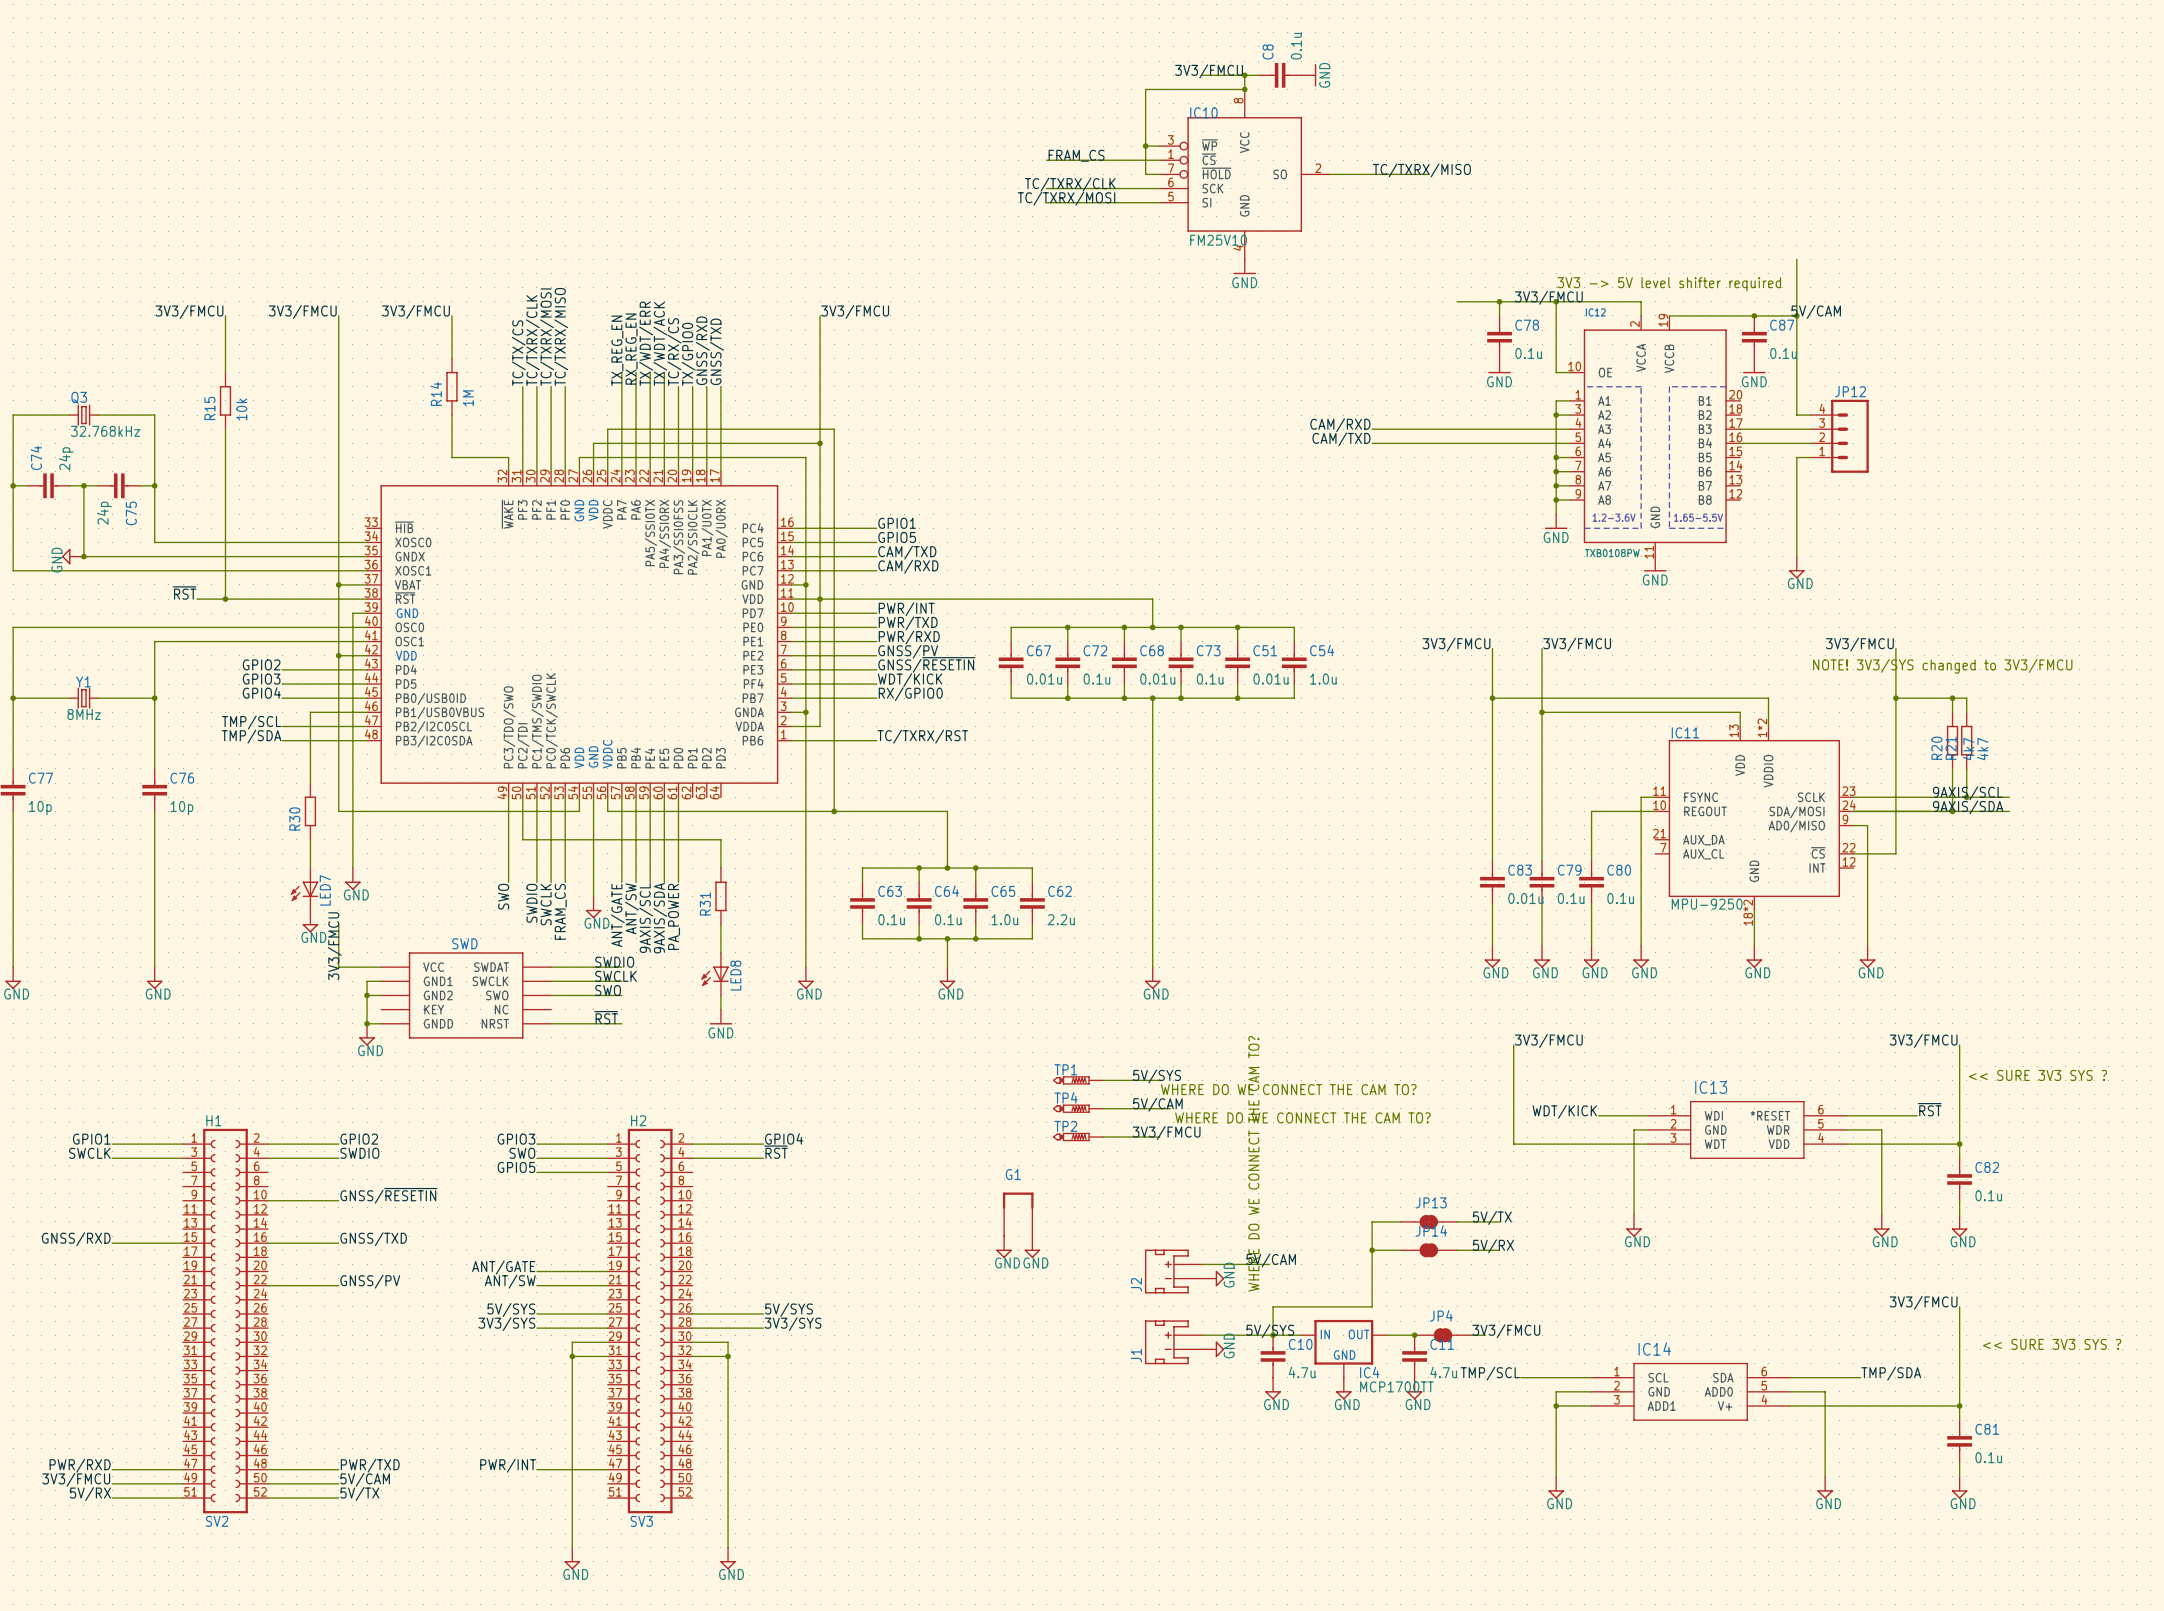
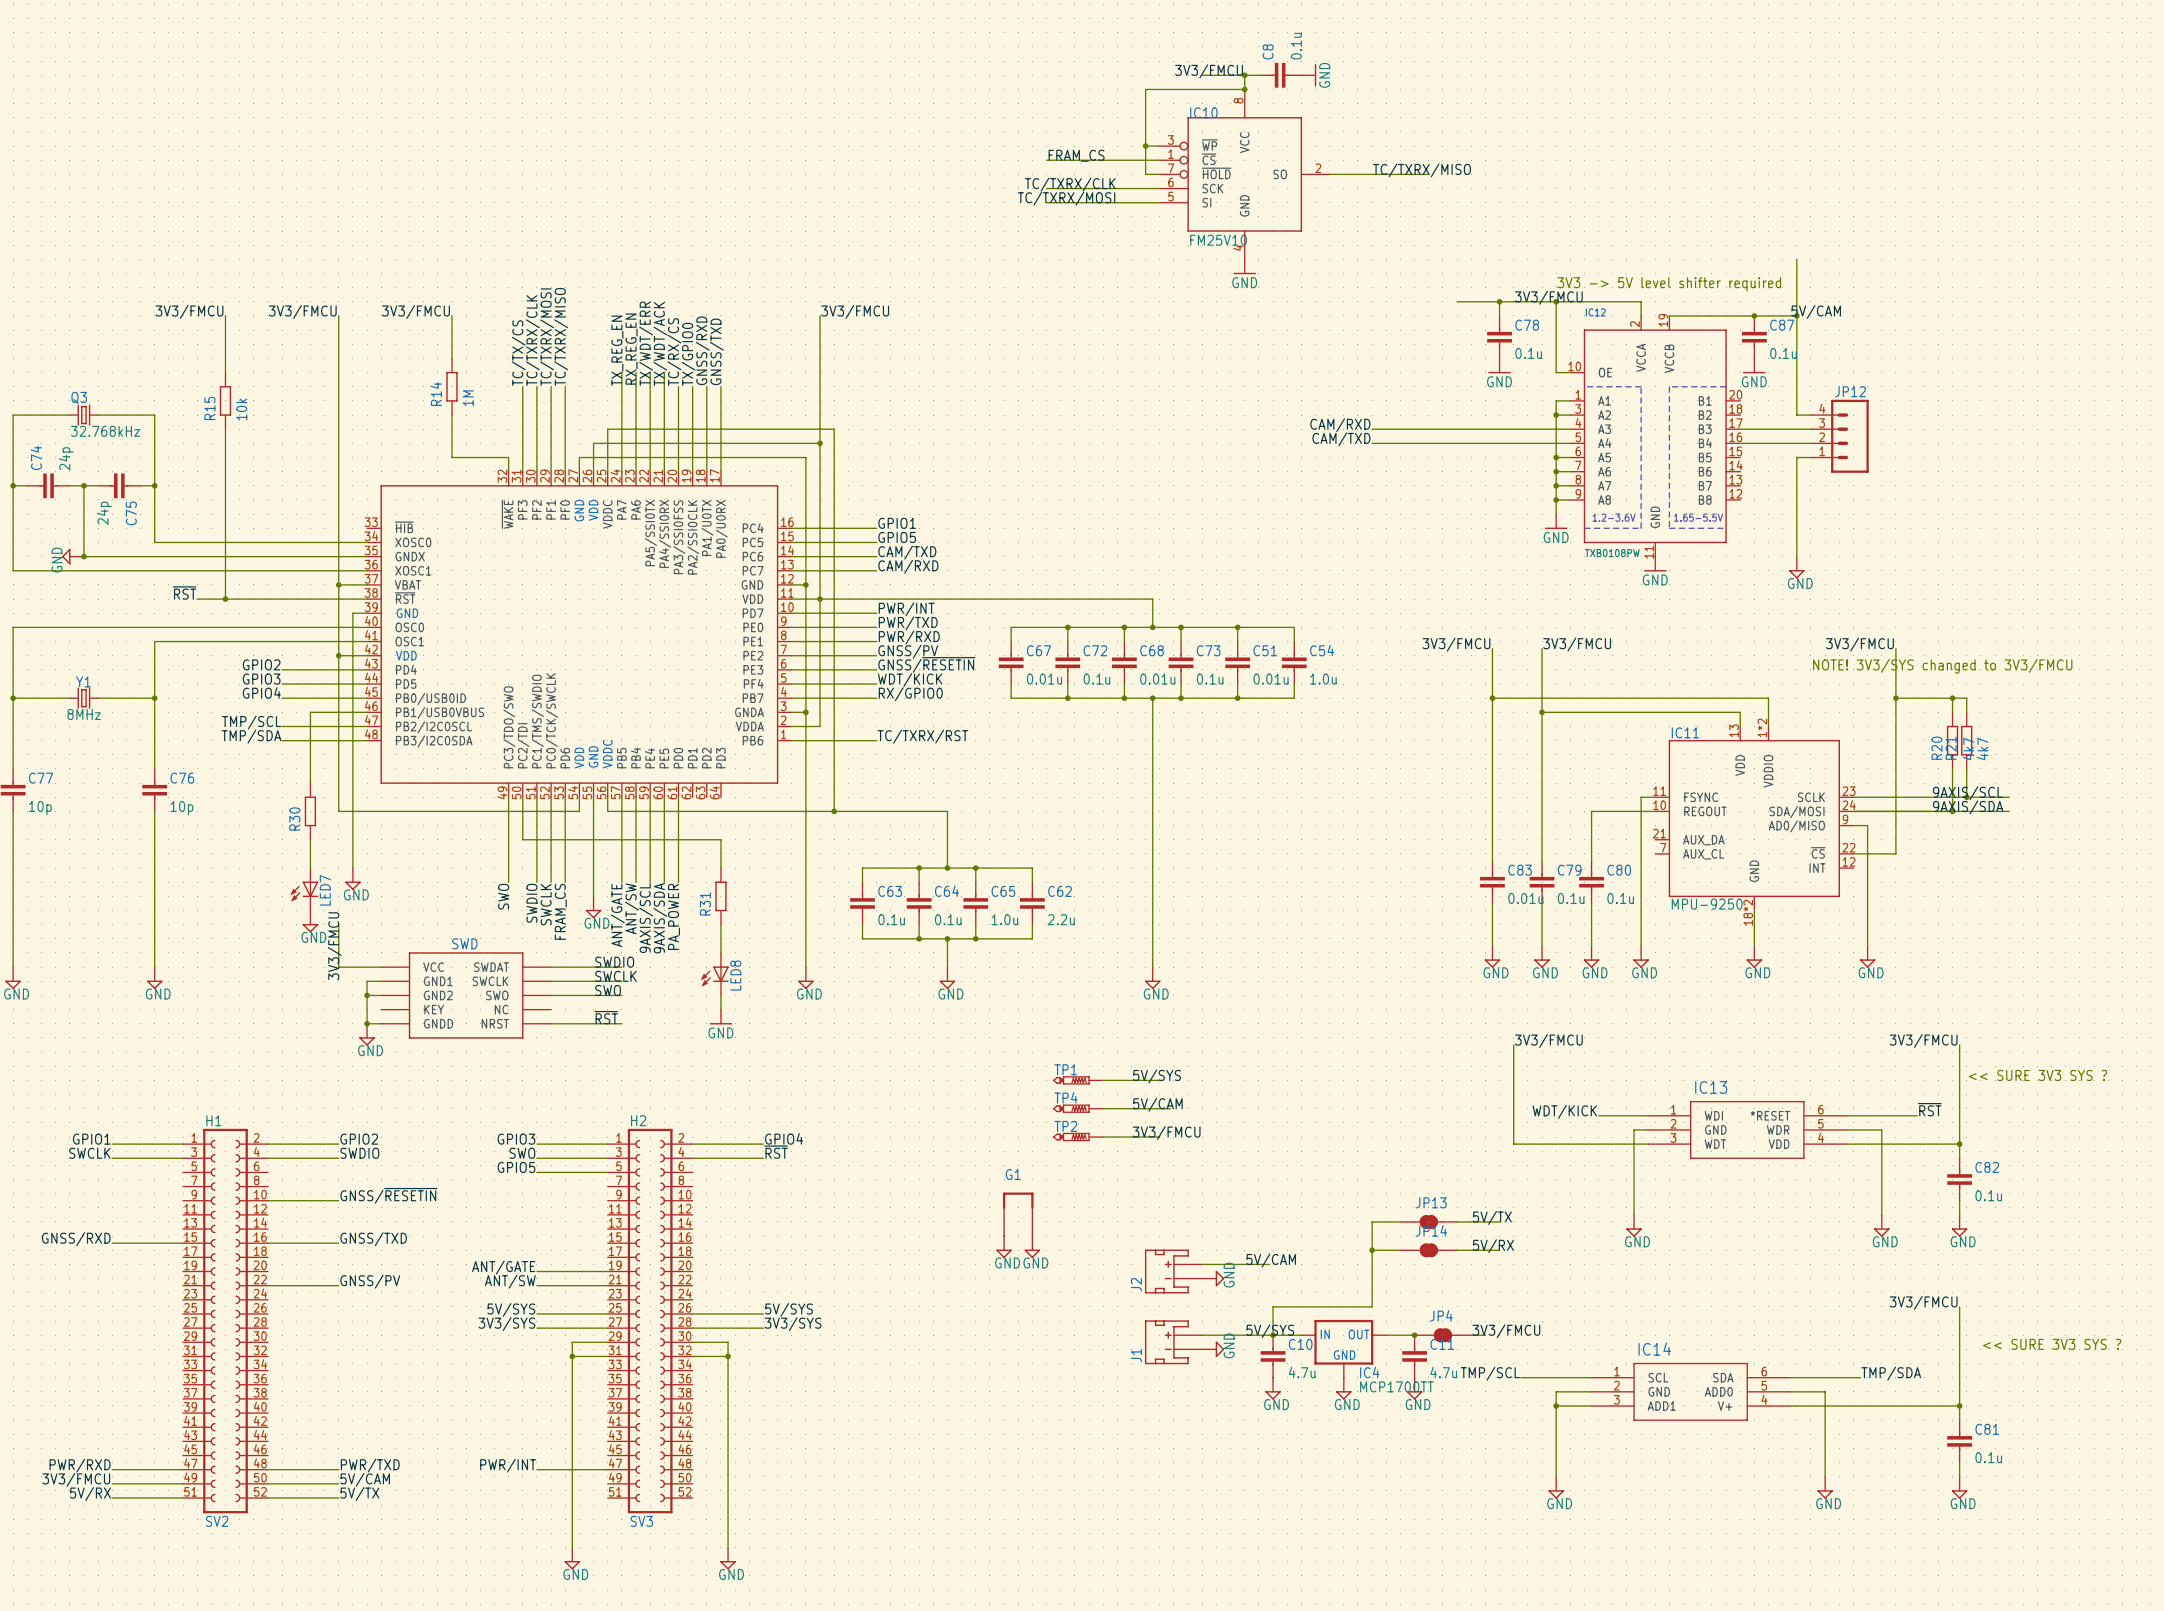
text: WHERE DO WE CONNECT THE CAM TO? (1288, 1089) -> none
text: WHERE DO WE CONNECT THE CAM TO? (1302, 1117) -> none
text: WHERE DO WE CONNECT THE CAM TO? (1253, 1163) -> none

